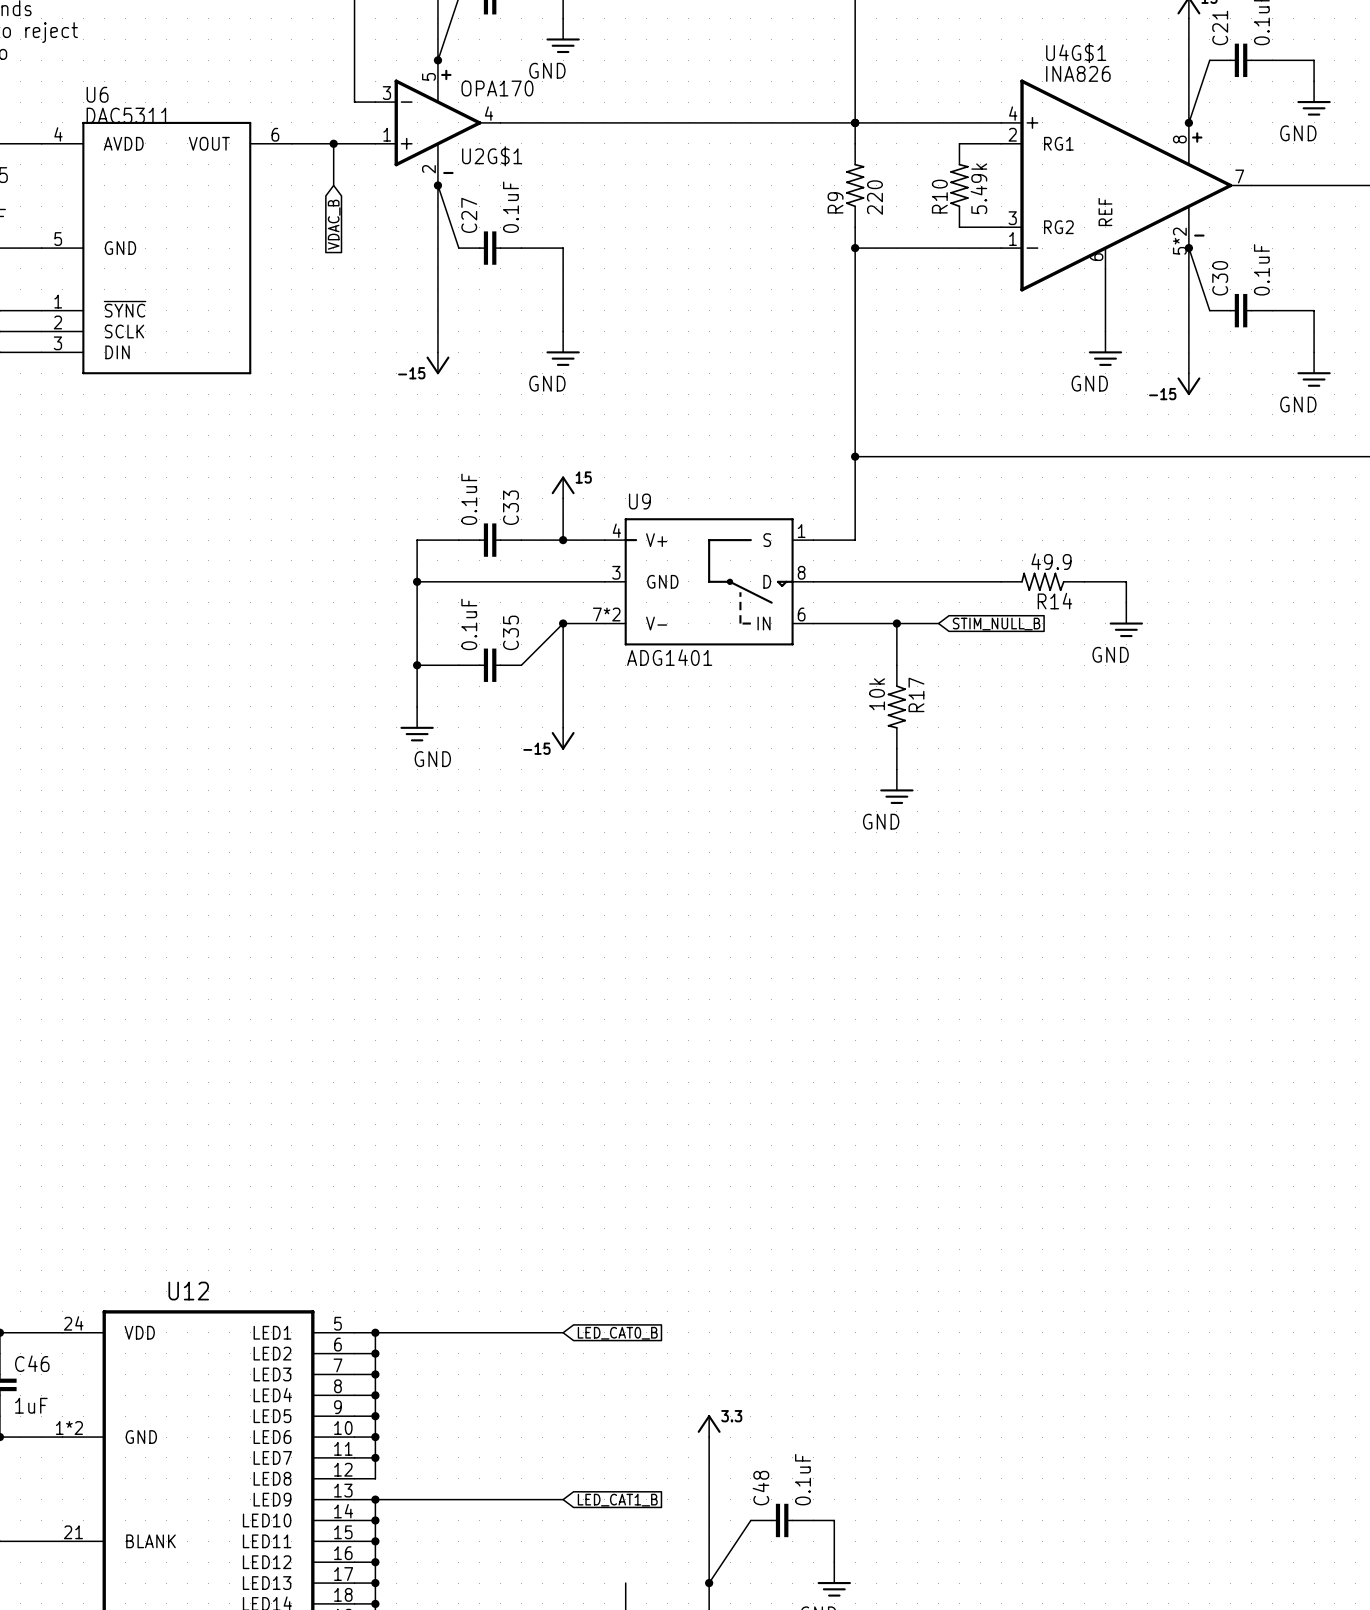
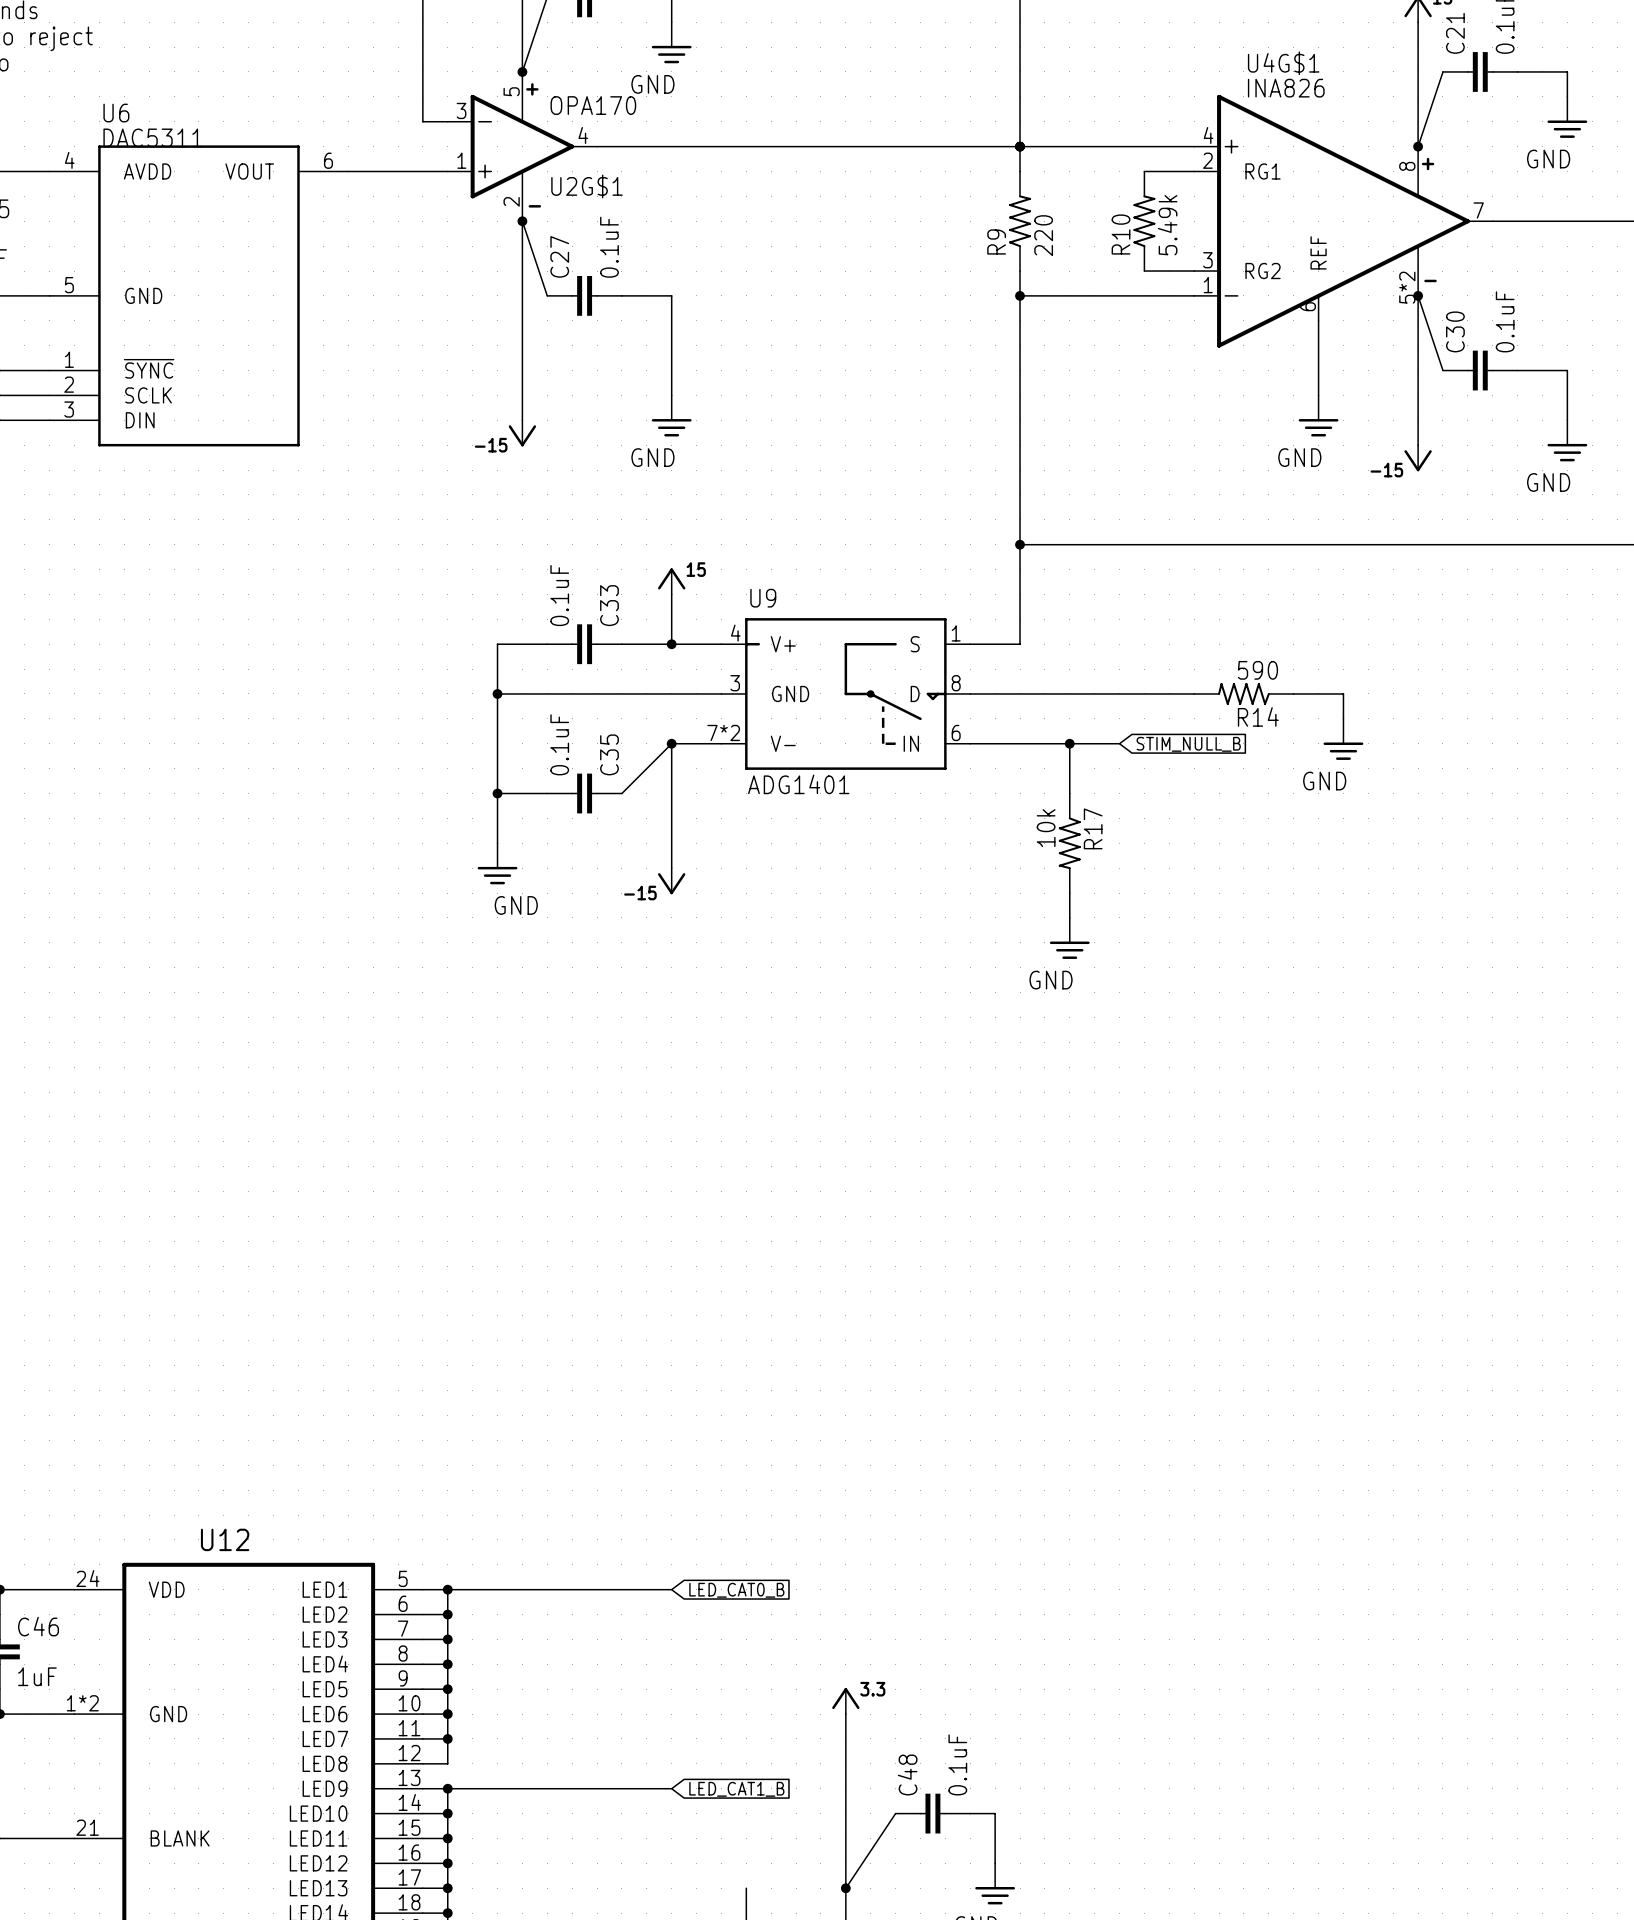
wire: (333, 143) (333, 185) -> none
junction: (333, 143) -> none
global label: VDAC_B (334, 224) -> none
R14 value: 49.9 (1051, 561) -> 590 (1257, 670)

